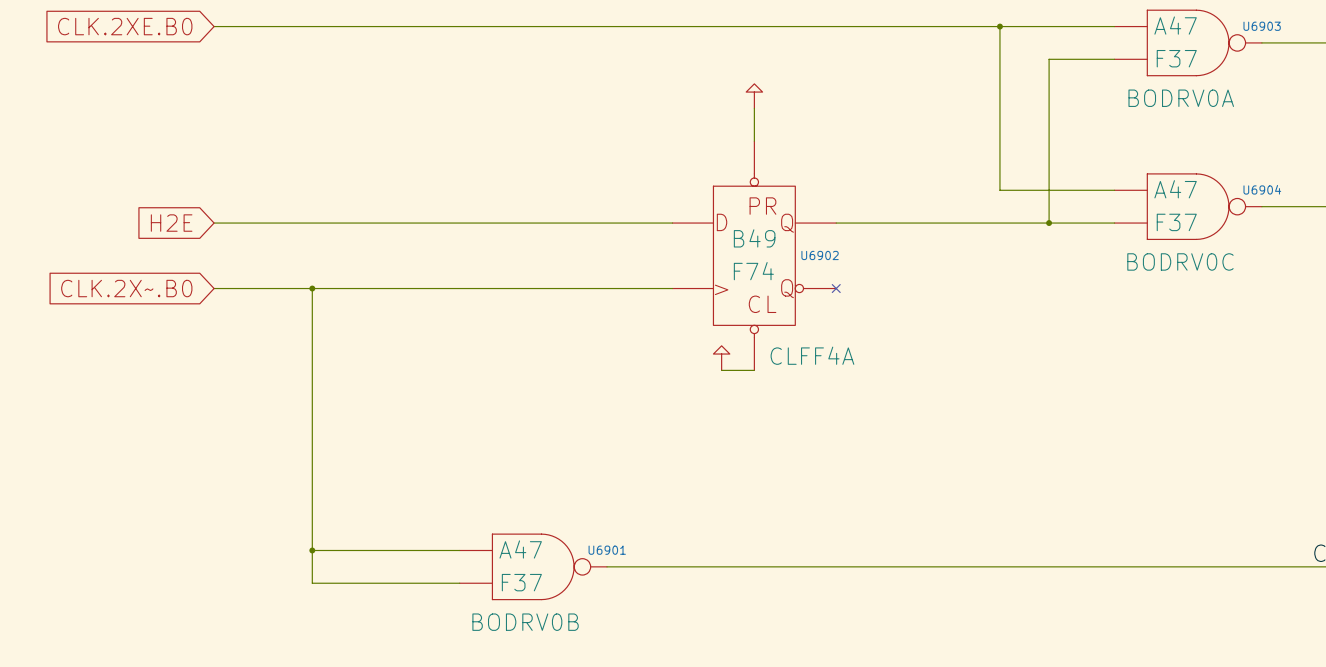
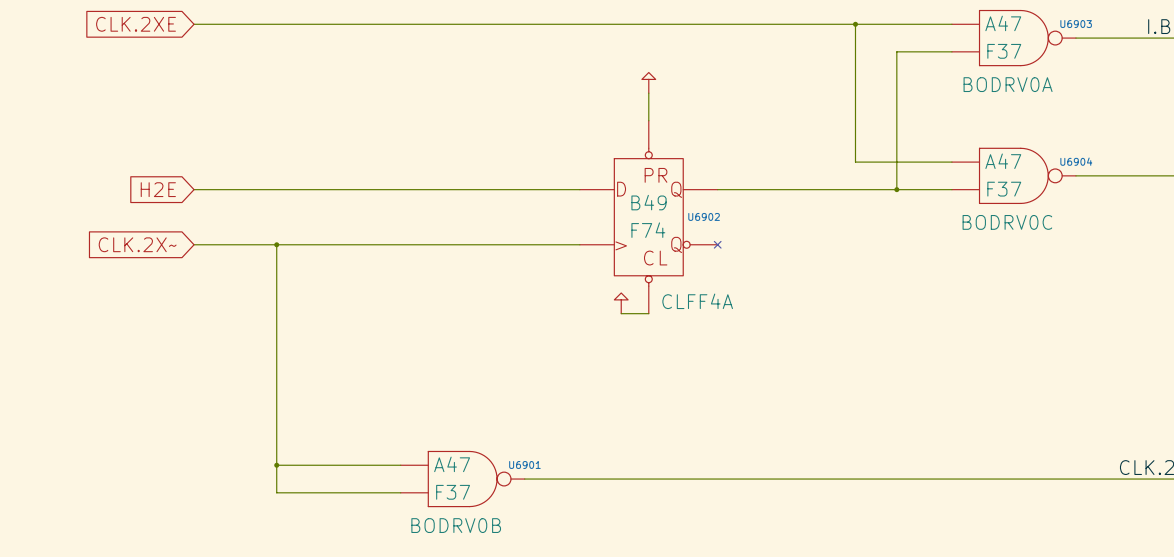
global label: CLK.2XE.B0 (125, 26) -> CLK.2XE (136, 24)
global label: CLK.2X~.B0 (126, 288) -> CLK.2X~ (137, 244)

